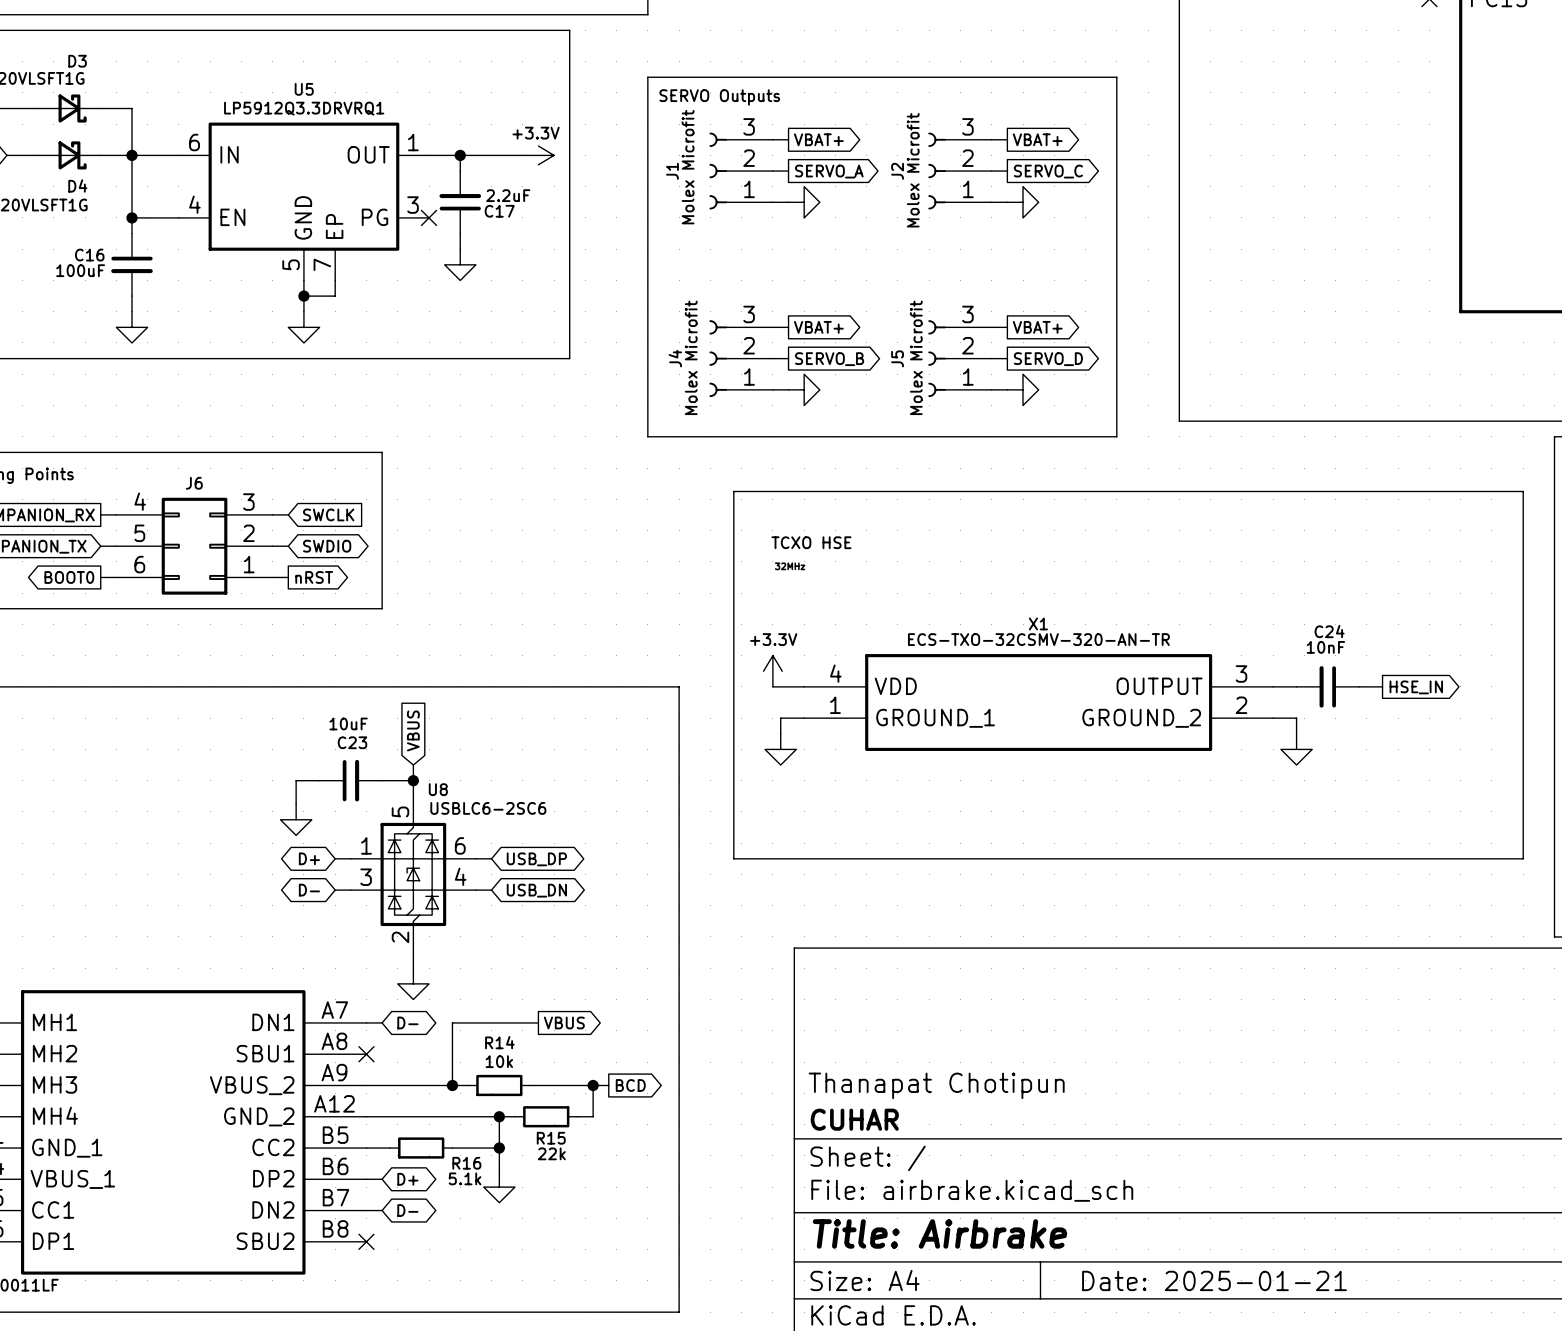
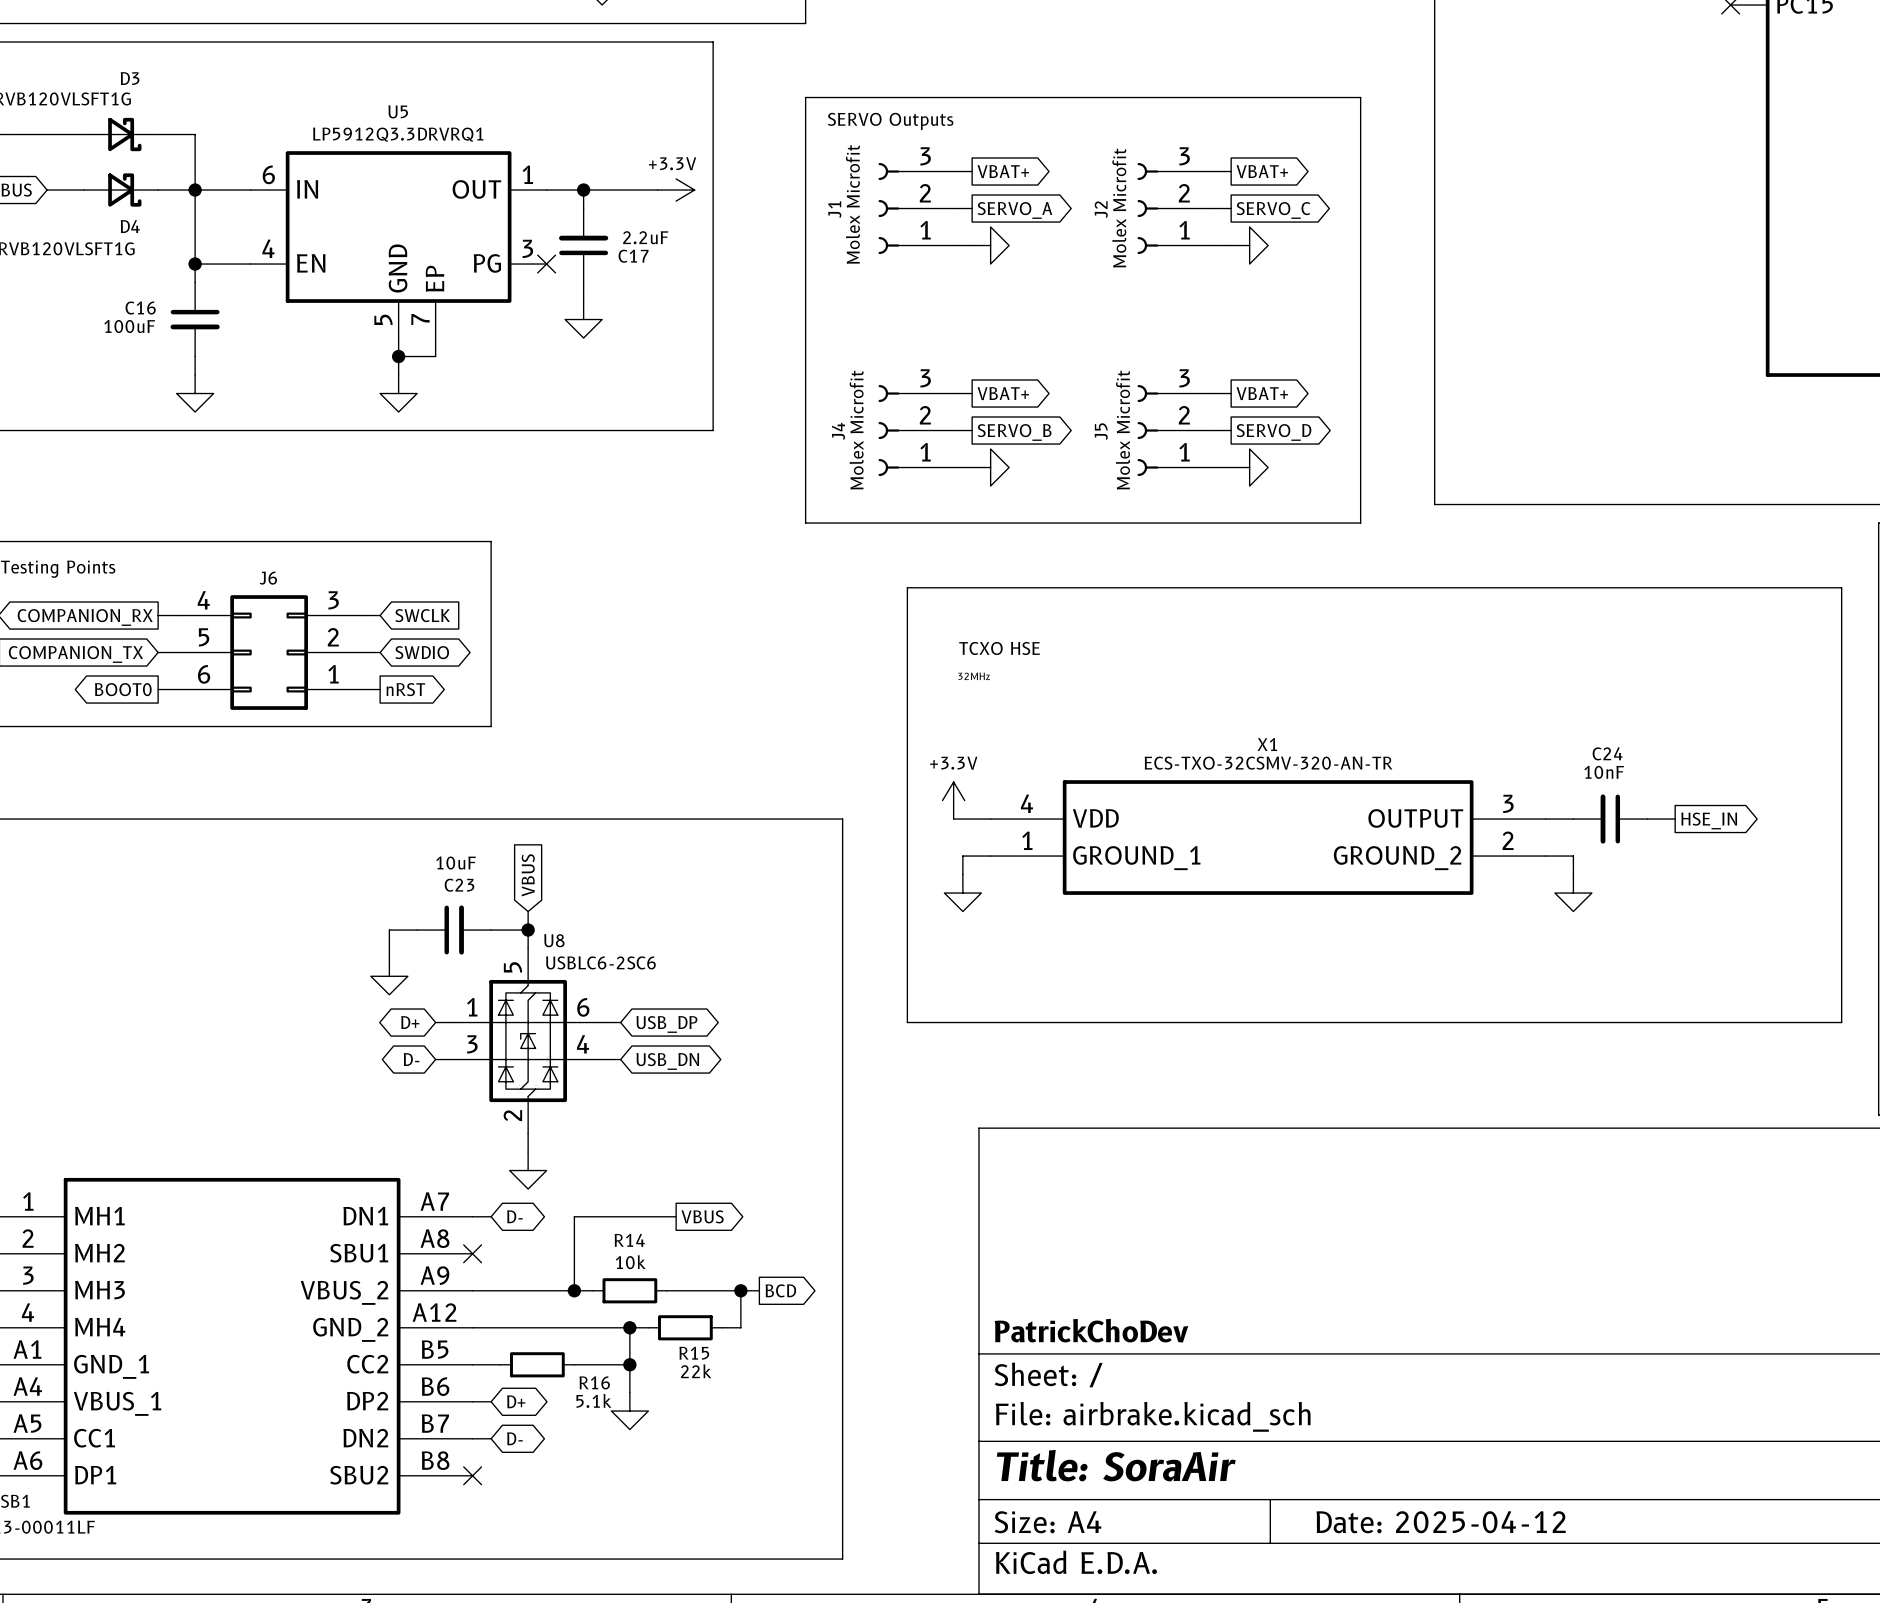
title block: Thanapat Chotipun (936, 1085) -> none
title block: CUHAR (854, 1119) -> PatrickChoDev (1091, 1330)
title block: Title: Airbrake (939, 1233) -> Title: SoraAir (1116, 1465)
title block: Date: 2025-01-21 (1214, 1280) -> Date: 2025-04-12 (1441, 1522)

